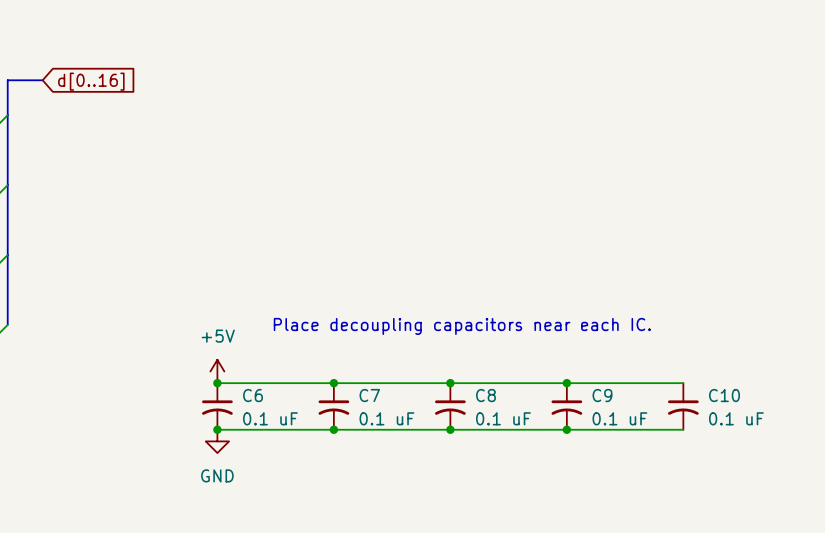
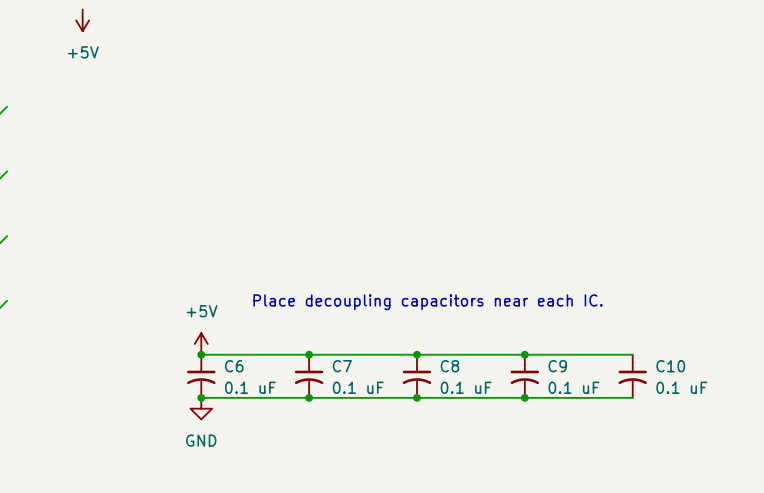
power symbol: none -> +5V (82, 20)
bus: (42, 80) (7, 80) (7, 324) -> none
global label: d[0..16] (91, 81) -> none

